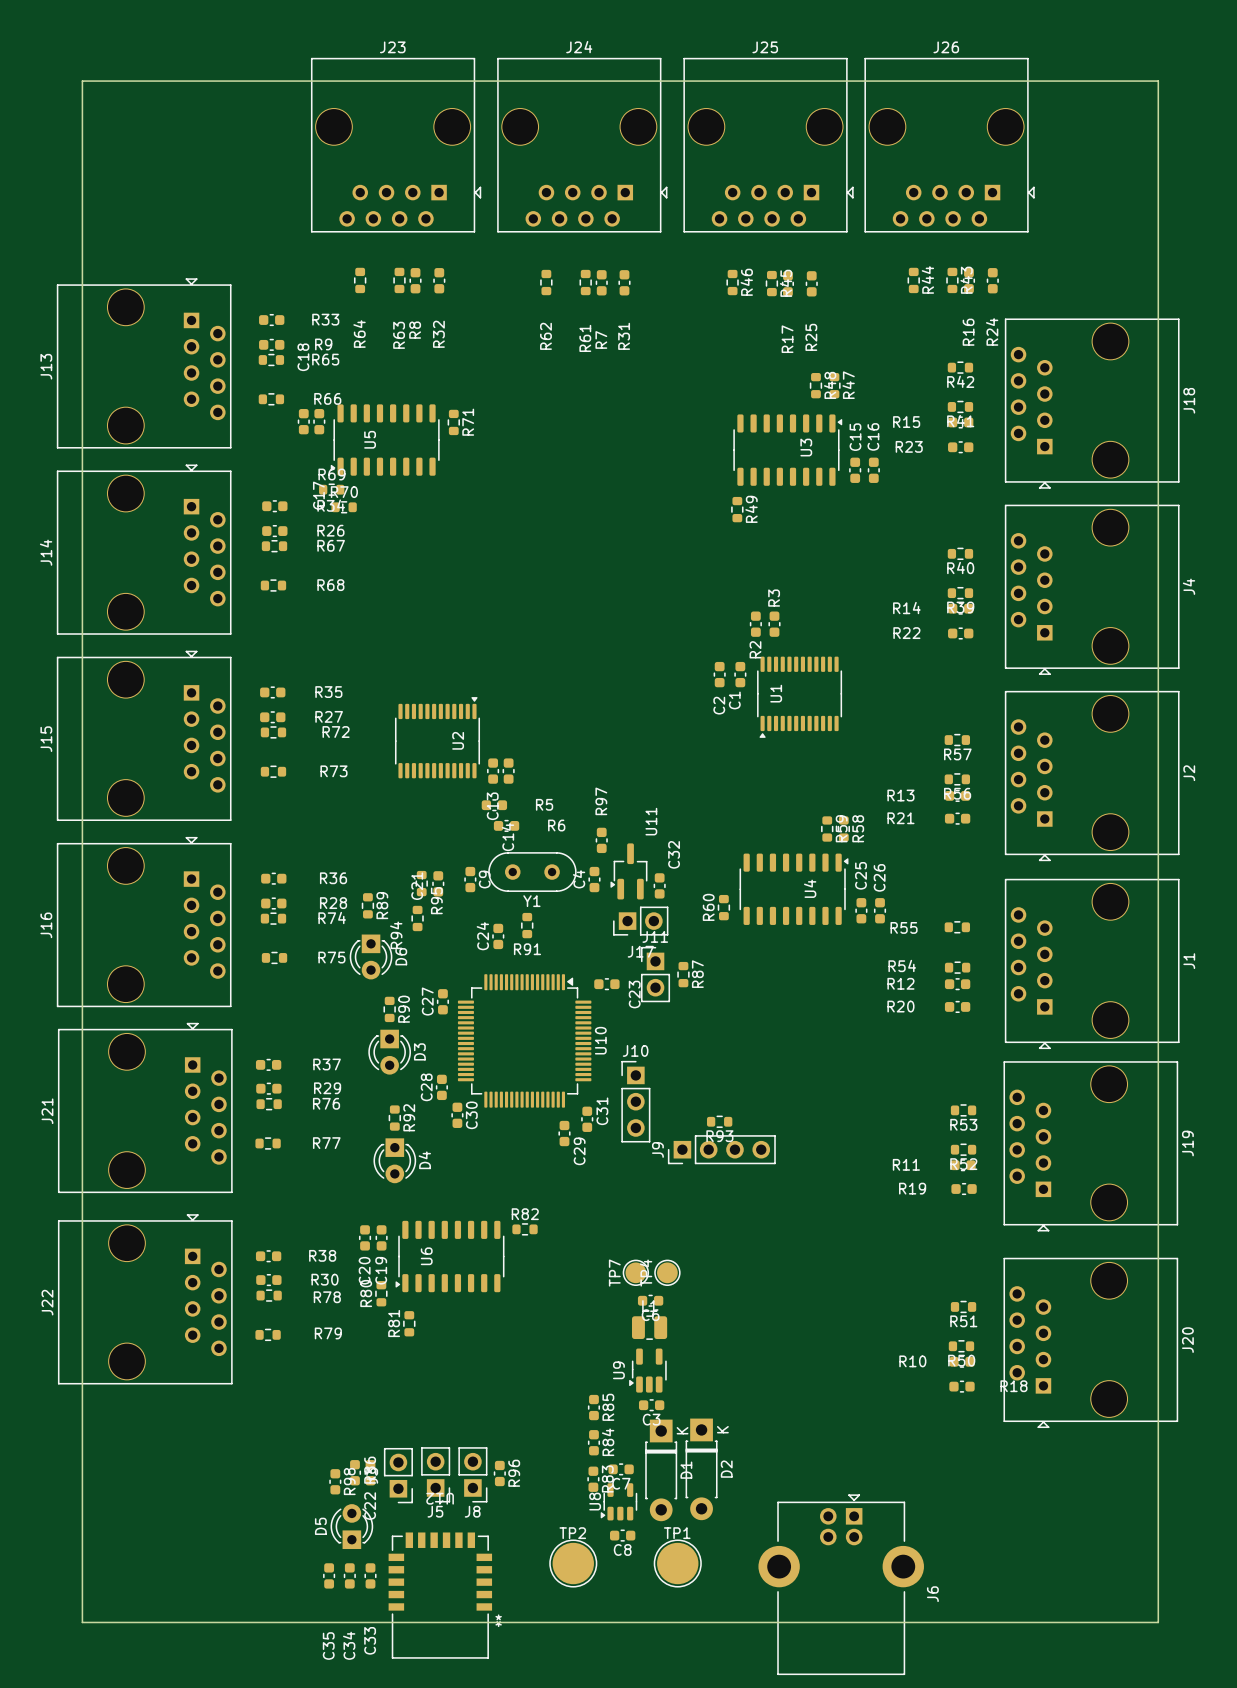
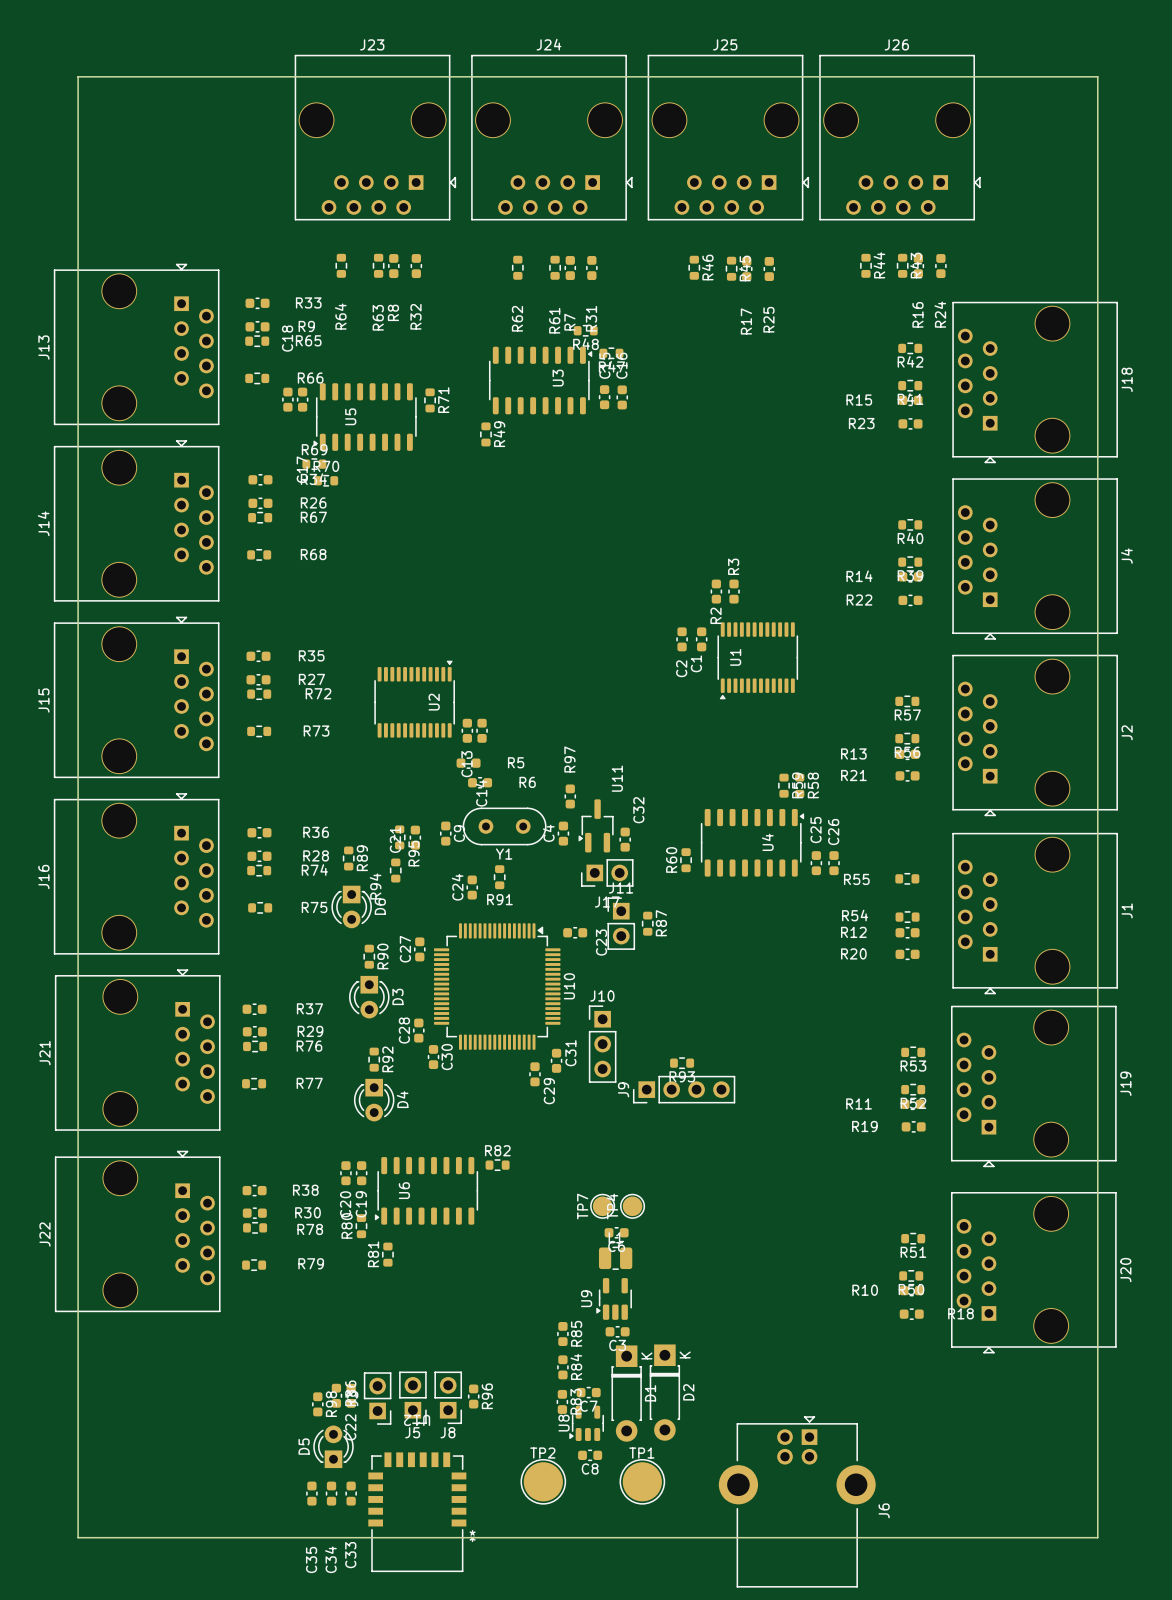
R48 rotation: 0° (815, 385) -> 90° clockwise (585, 330)
R48 position: (815, 385) -> (585, 330)
R47 rotation: 0° (834, 385) -> 90° clockwise (611, 353)
R47 position: (834, 385) -> (611, 353)
U3 position: (787, 450) -> (540, 380)
C15 position: (855, 470) -> (604, 397)
C16 position: (873, 470) -> (622, 397)
R49 position: (737, 509) -> (485, 434)

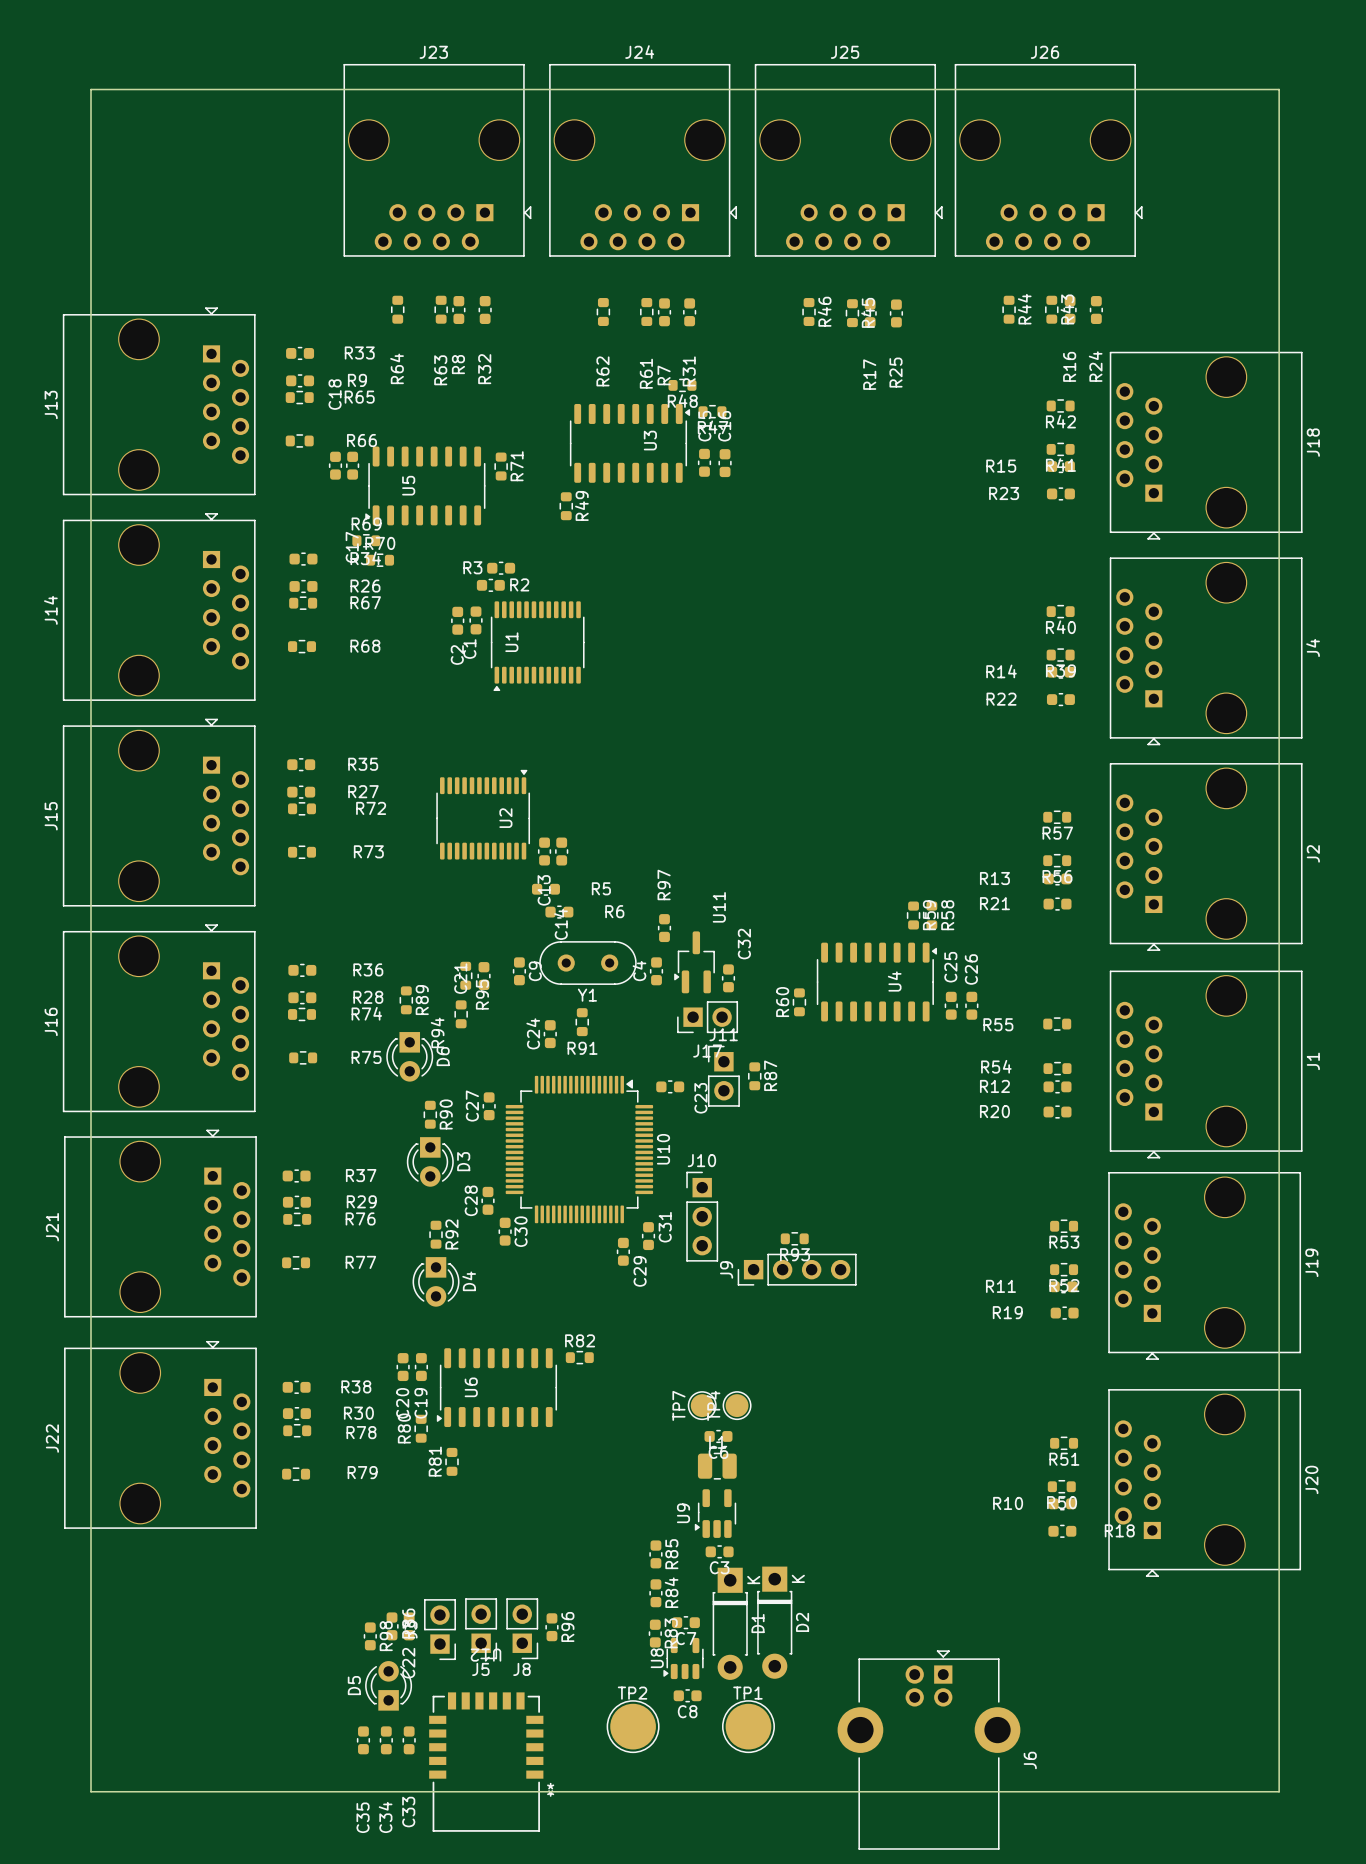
R3 name position: R3 (733, 566) -> R3 (472, 567)
R2 rotation: 0° (716, 591) -> 90° clockwise (490, 585)
R2 position: (716, 591) -> (490, 585)
R3 rotation: 0° (734, 591) -> 90° clockwise (501, 568)
R3 position: (734, 591) -> (501, 568)
R2 name position: R2 (716, 615) -> R2 (519, 584)
C2 position: (682, 639) -> (457, 620)
C1 position: (701, 639) -> (476, 620)
U1 position: (757, 660) -> (537, 646)

